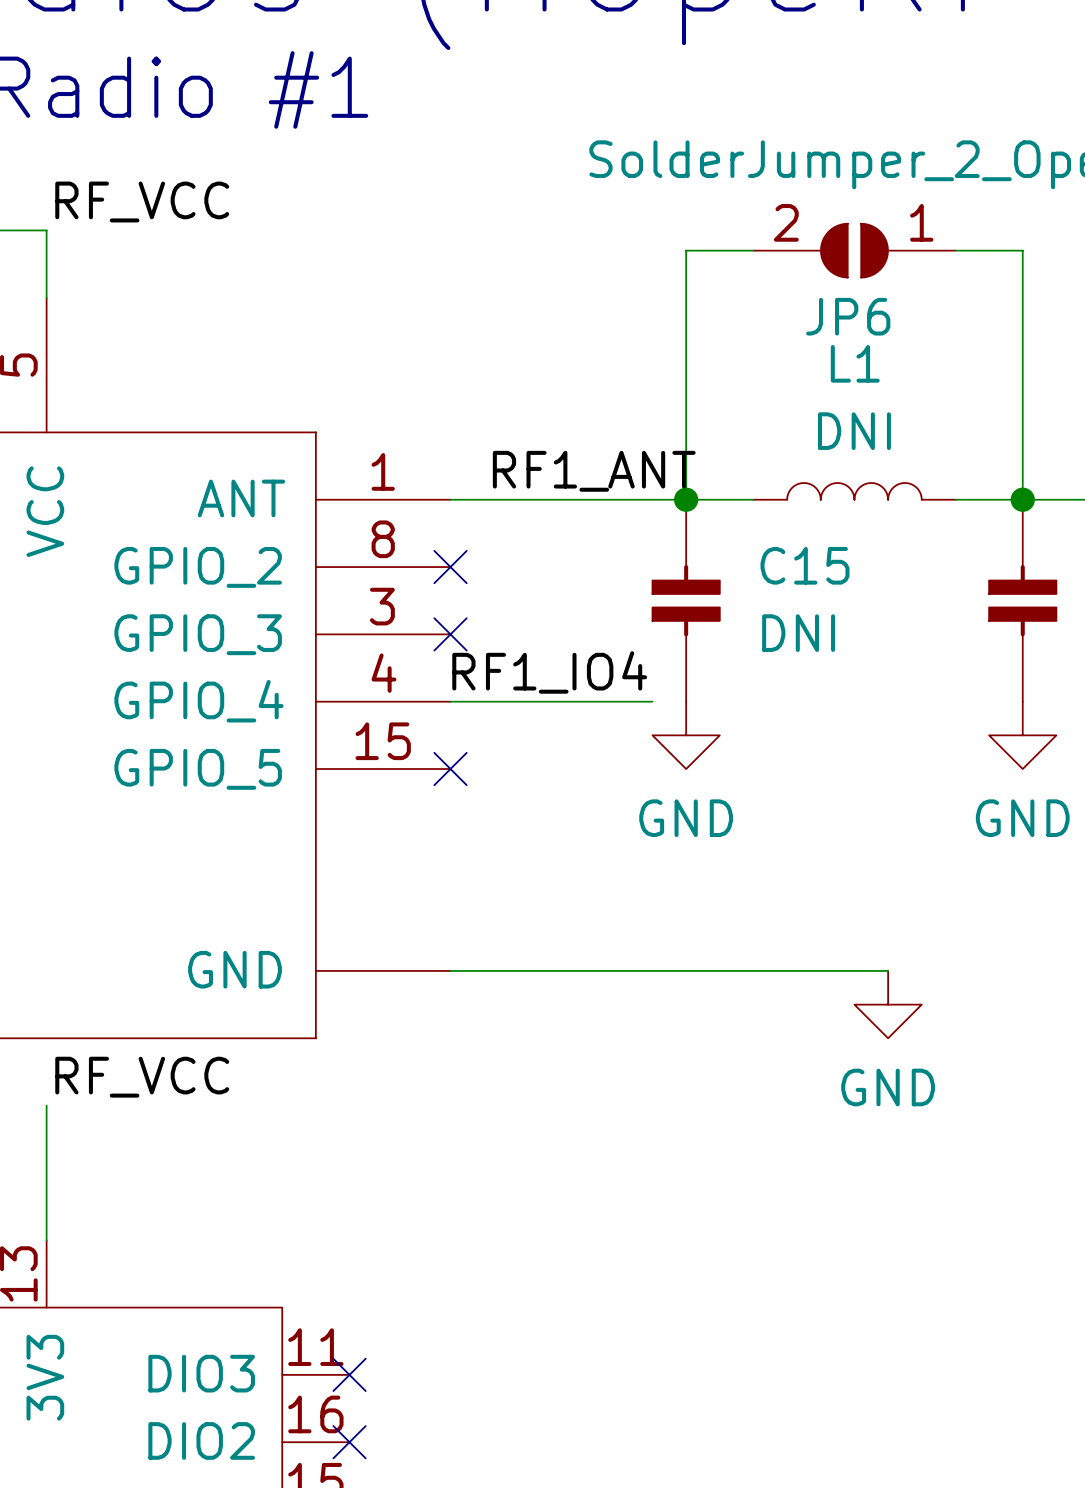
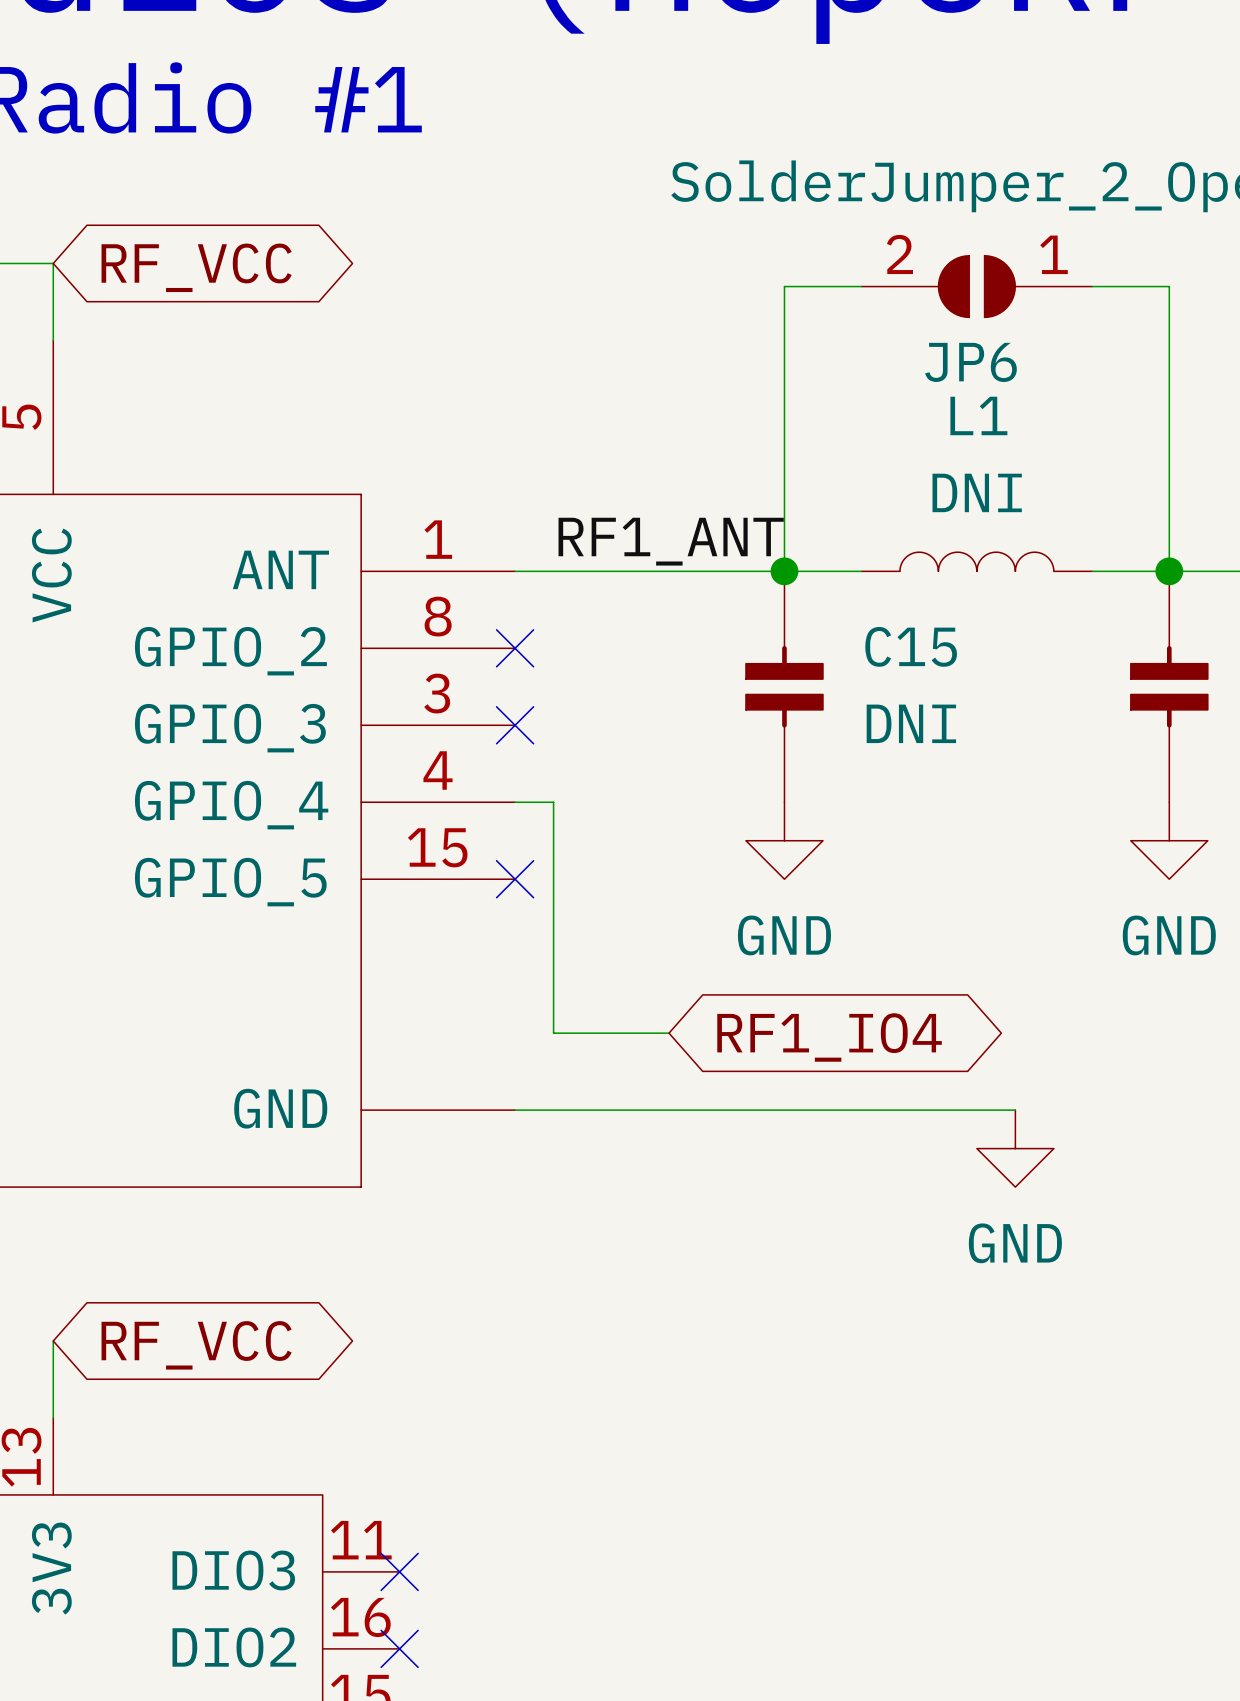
label: RF_VCC (142, 202) -> none
global label: none -> RF_VCC (196, 267)
label: RF1_IO4 (549, 672) -> none
wire: (484, 701) (652, 701) -> (553, 802) (553, 1033) (669, 1033)
global label: none -> RF1_IO4 (829, 1037)
label: RF_VCC (142, 1077) -> none
wire: (46, 1105) (46, 1172) -> none
global label: none -> RF_VCC (196, 1345)

